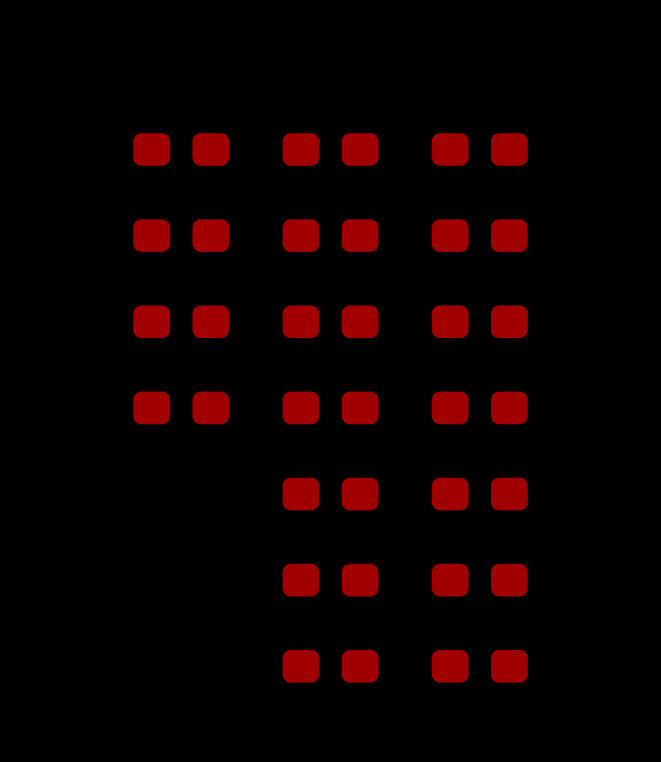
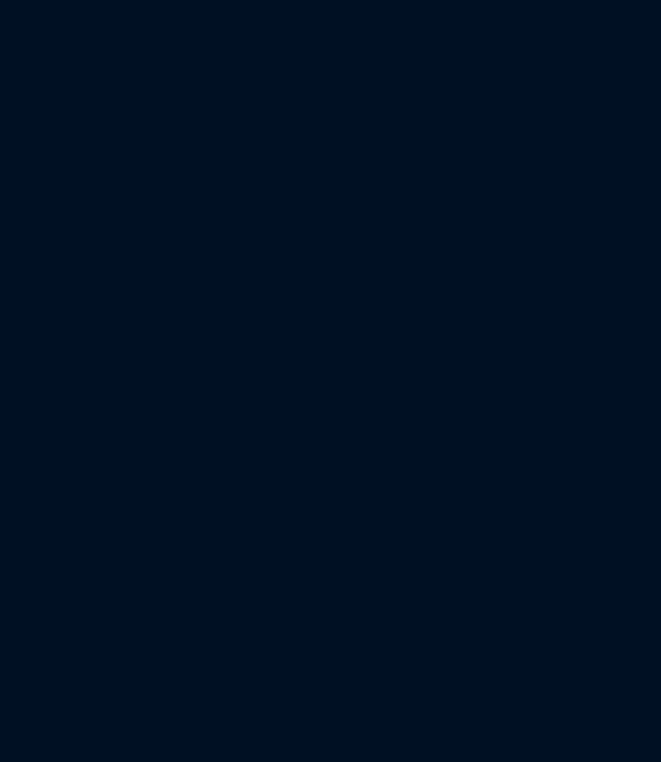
part: (181, 149) -> none
part: (330, 149) -> none
part: (479, 149) -> none
part: (181, 235) -> none
part: (330, 235) -> none
part: (479, 235) -> none
part: (181, 321) -> none
part: (330, 321) -> none
part: (479, 321) -> none
part: (181, 407) -> none
part: (330, 407) -> none
part: (479, 407) -> none
part: (330, 494) -> none
part: (479, 494) -> none
part: (330, 580) -> none
part: (479, 580) -> none
part: (330, 666) -> none
part: (479, 666) -> none

